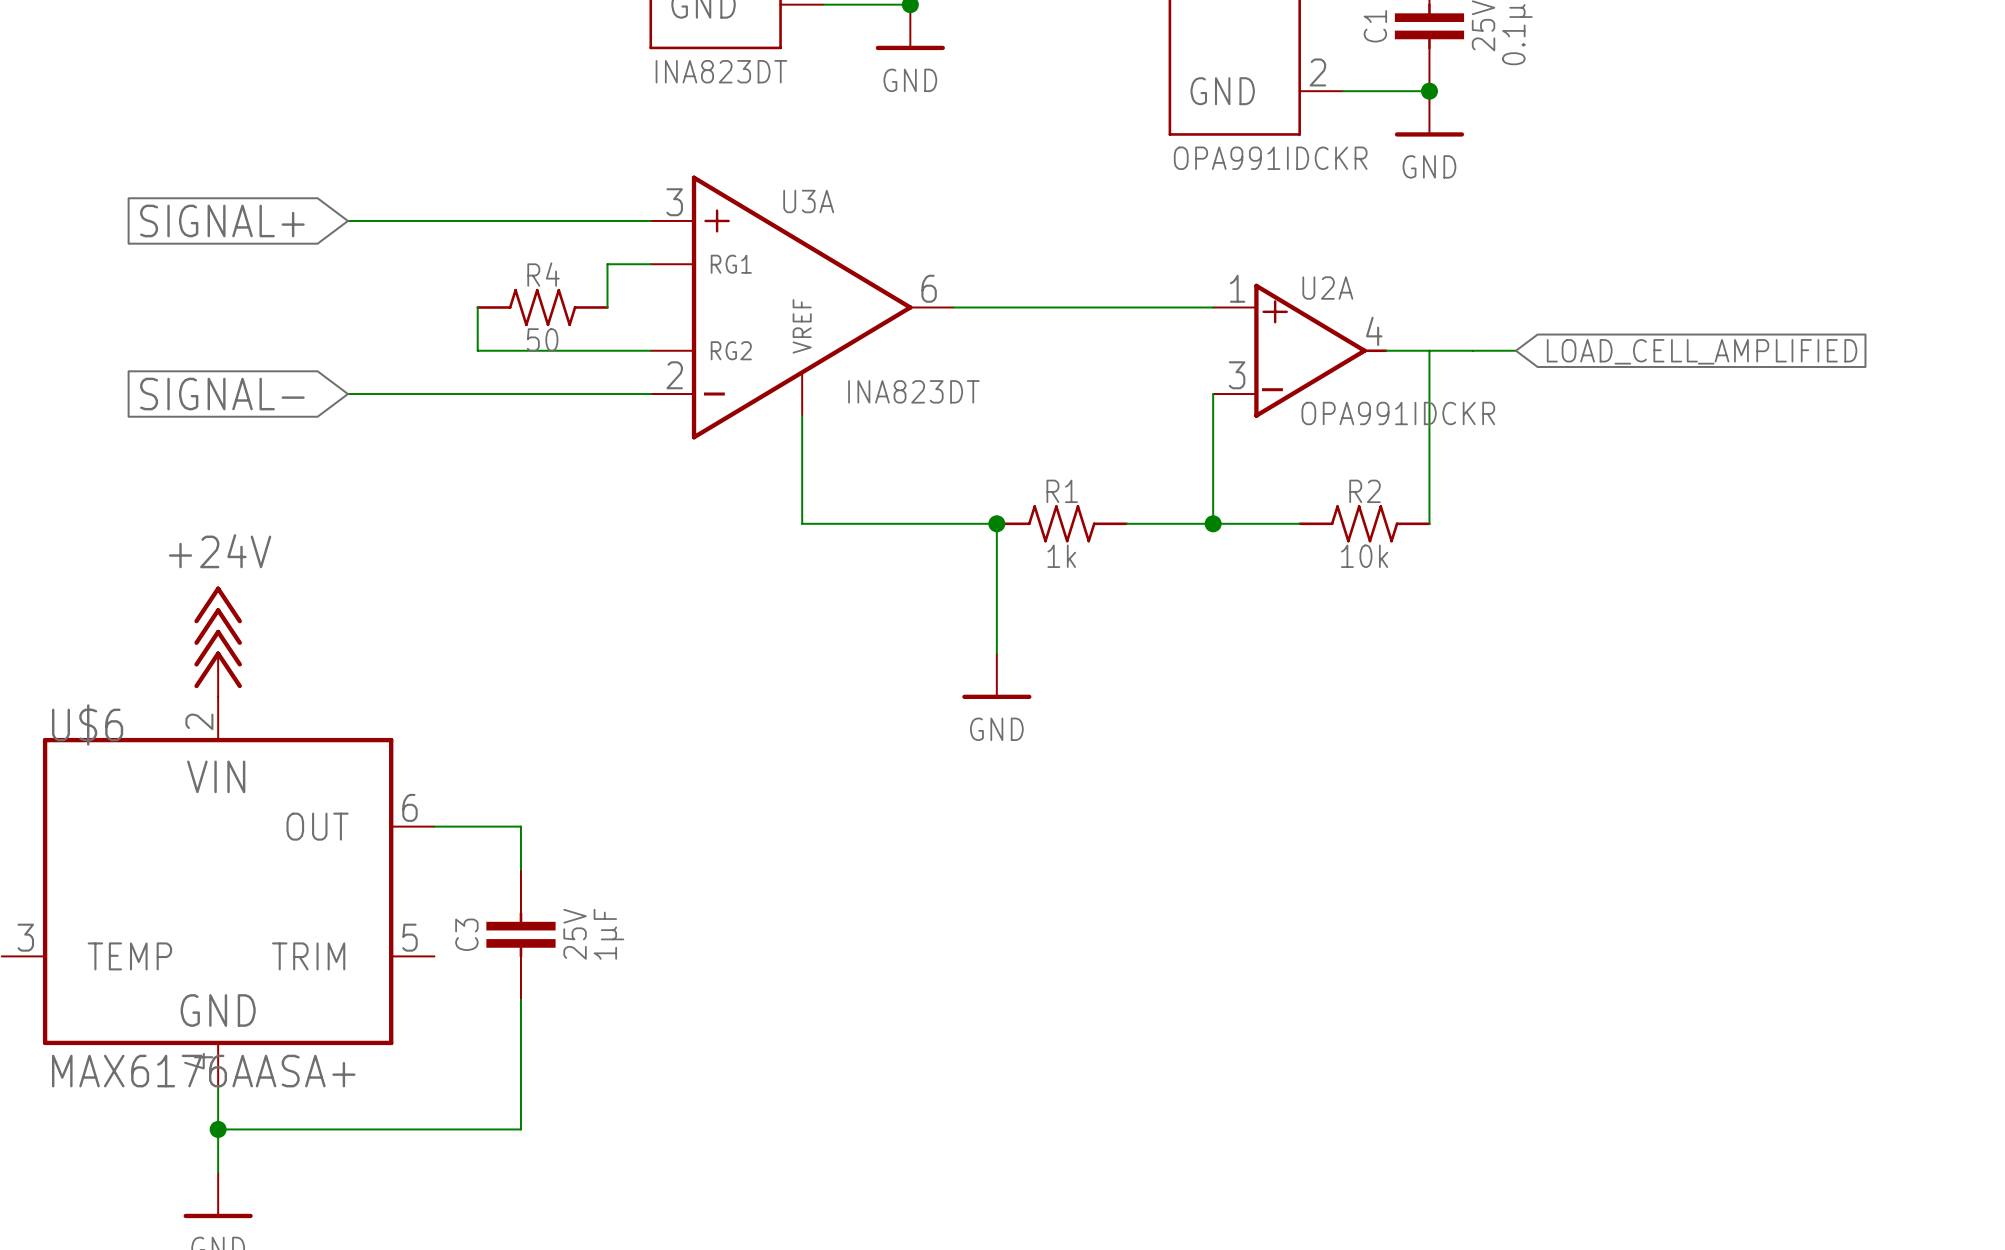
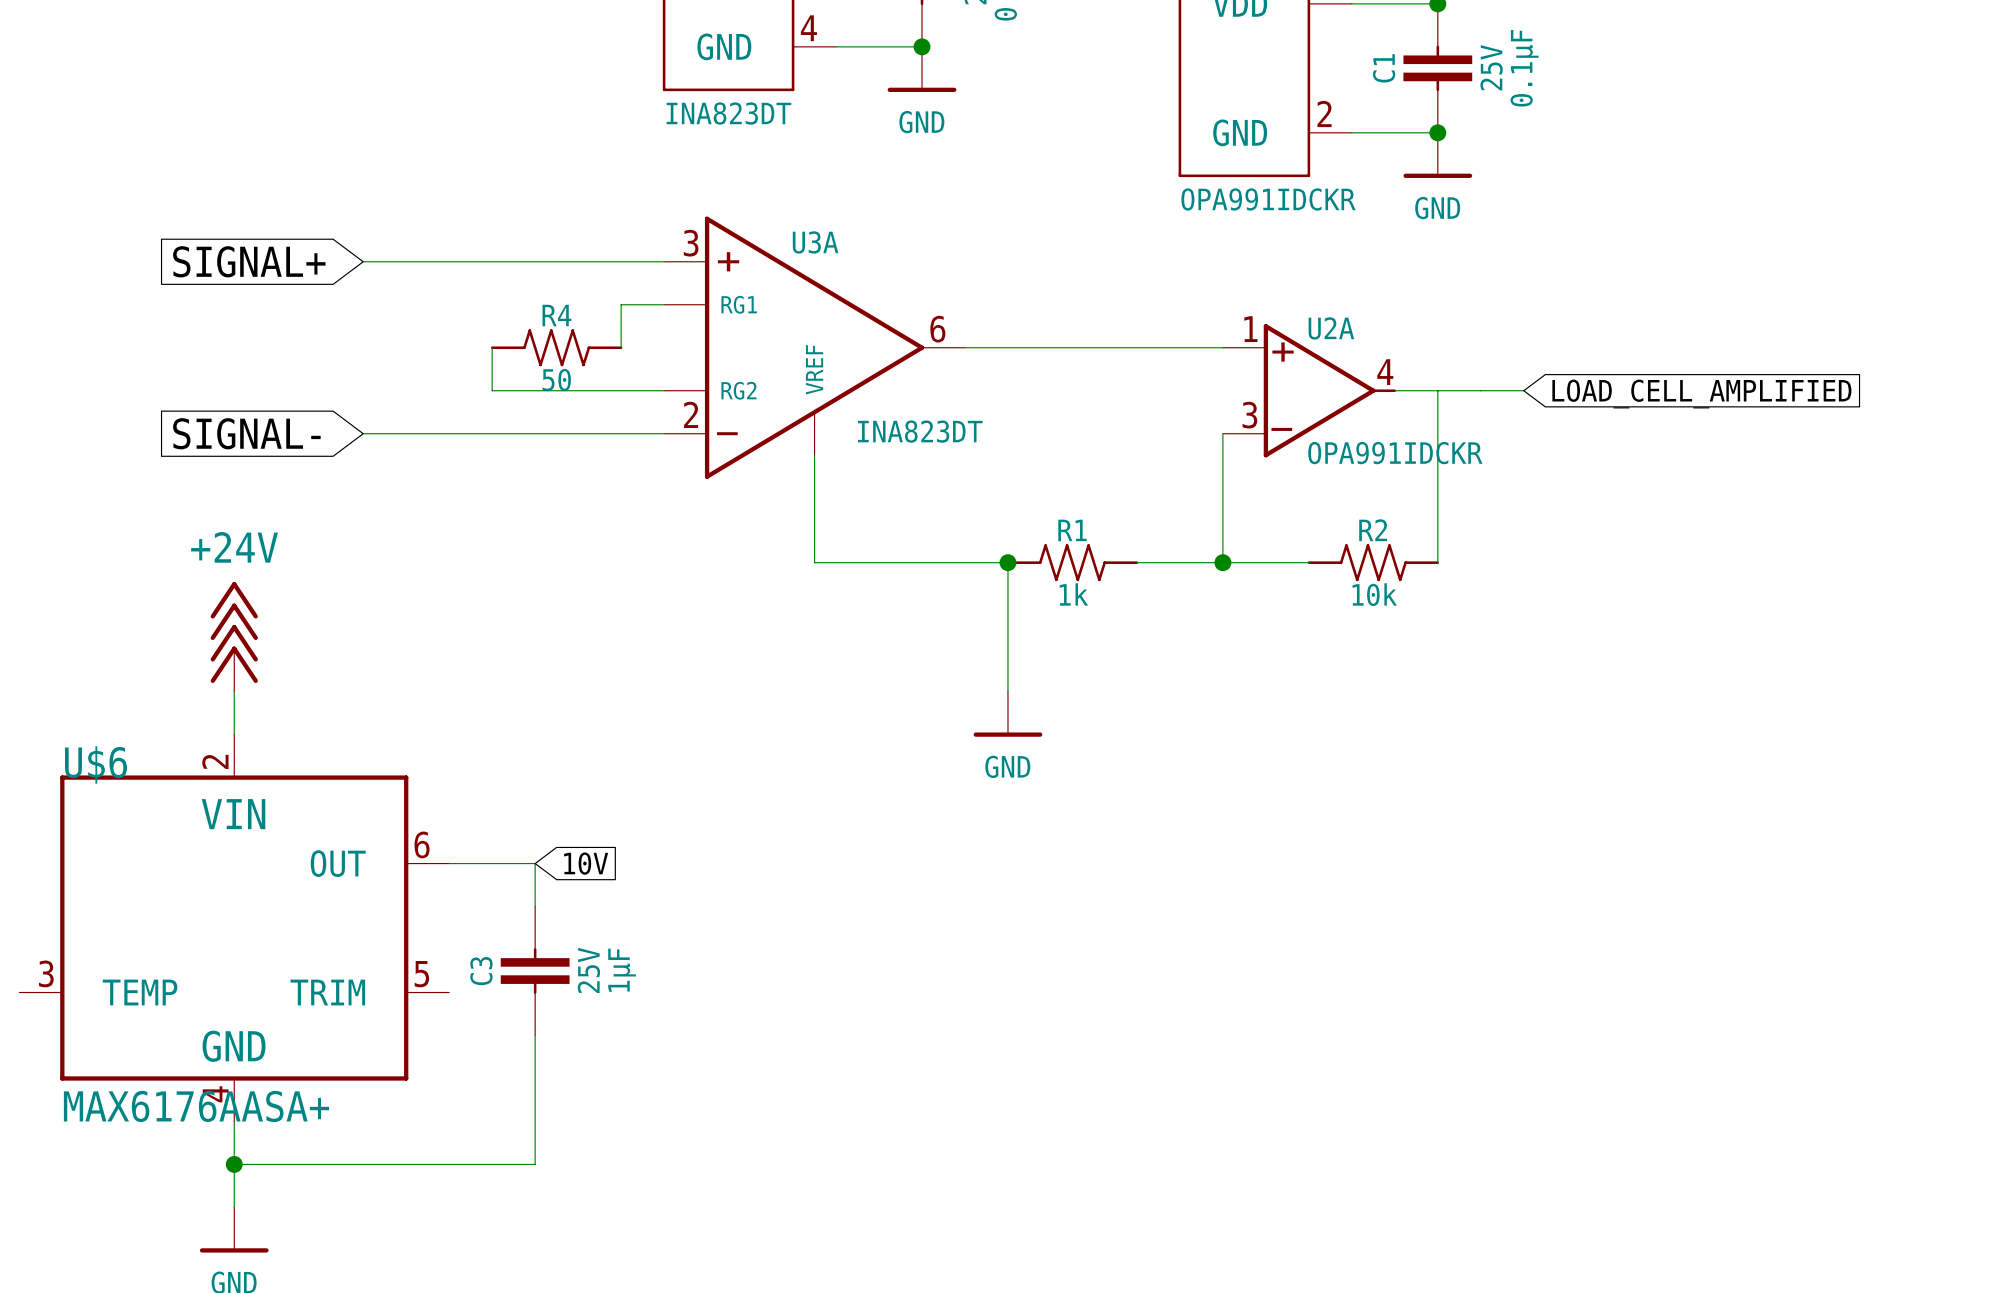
power symbol position: +24V (218, 641) -> +24V (234, 636)
global label: none -> 10V (586, 863)

